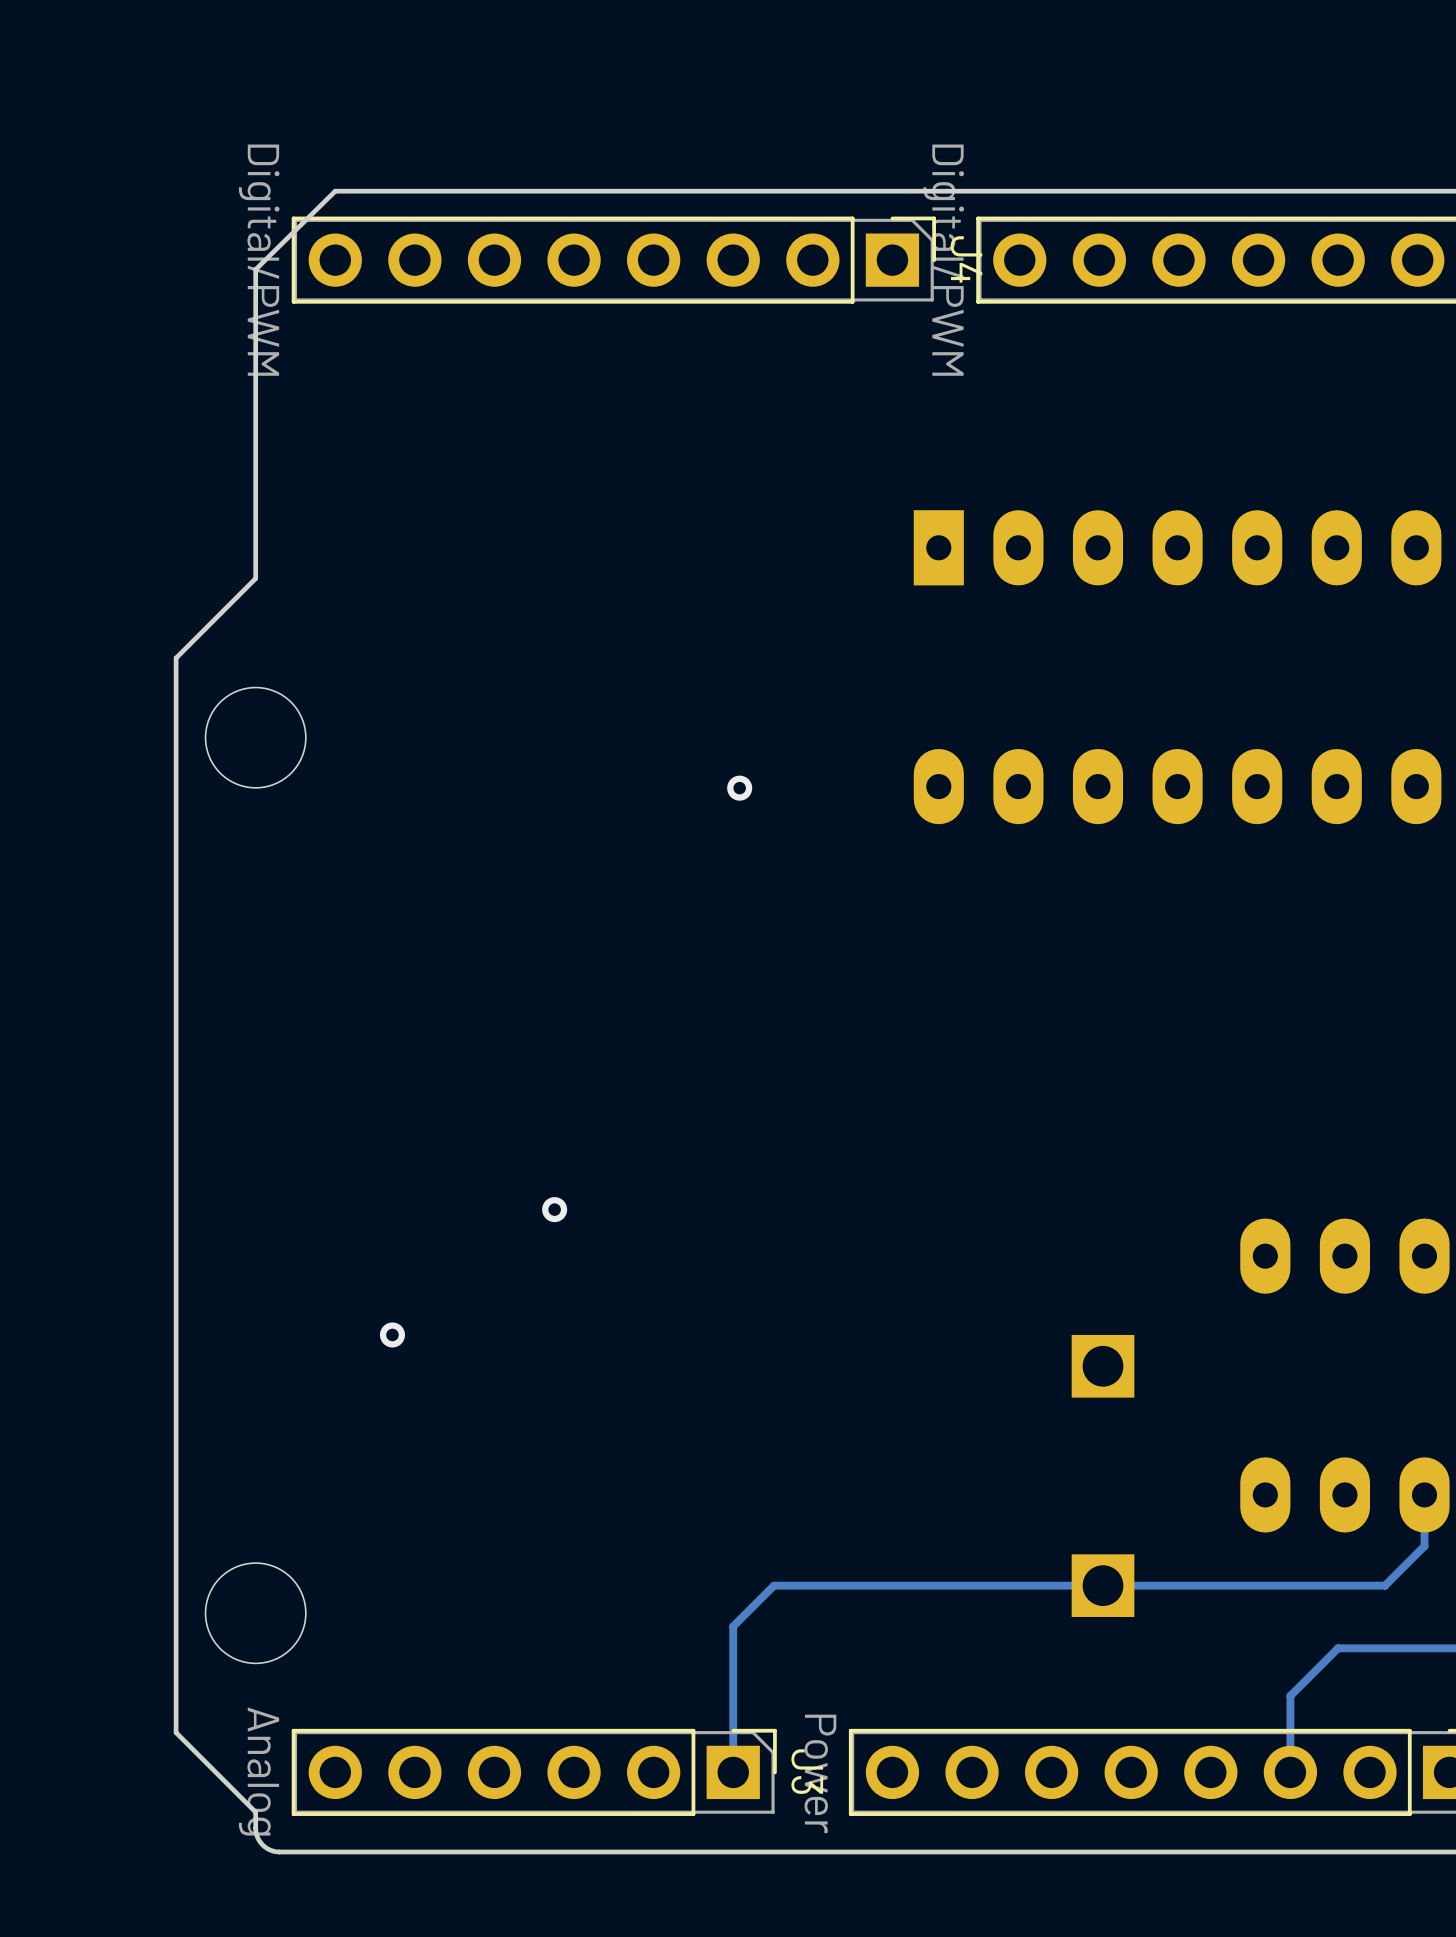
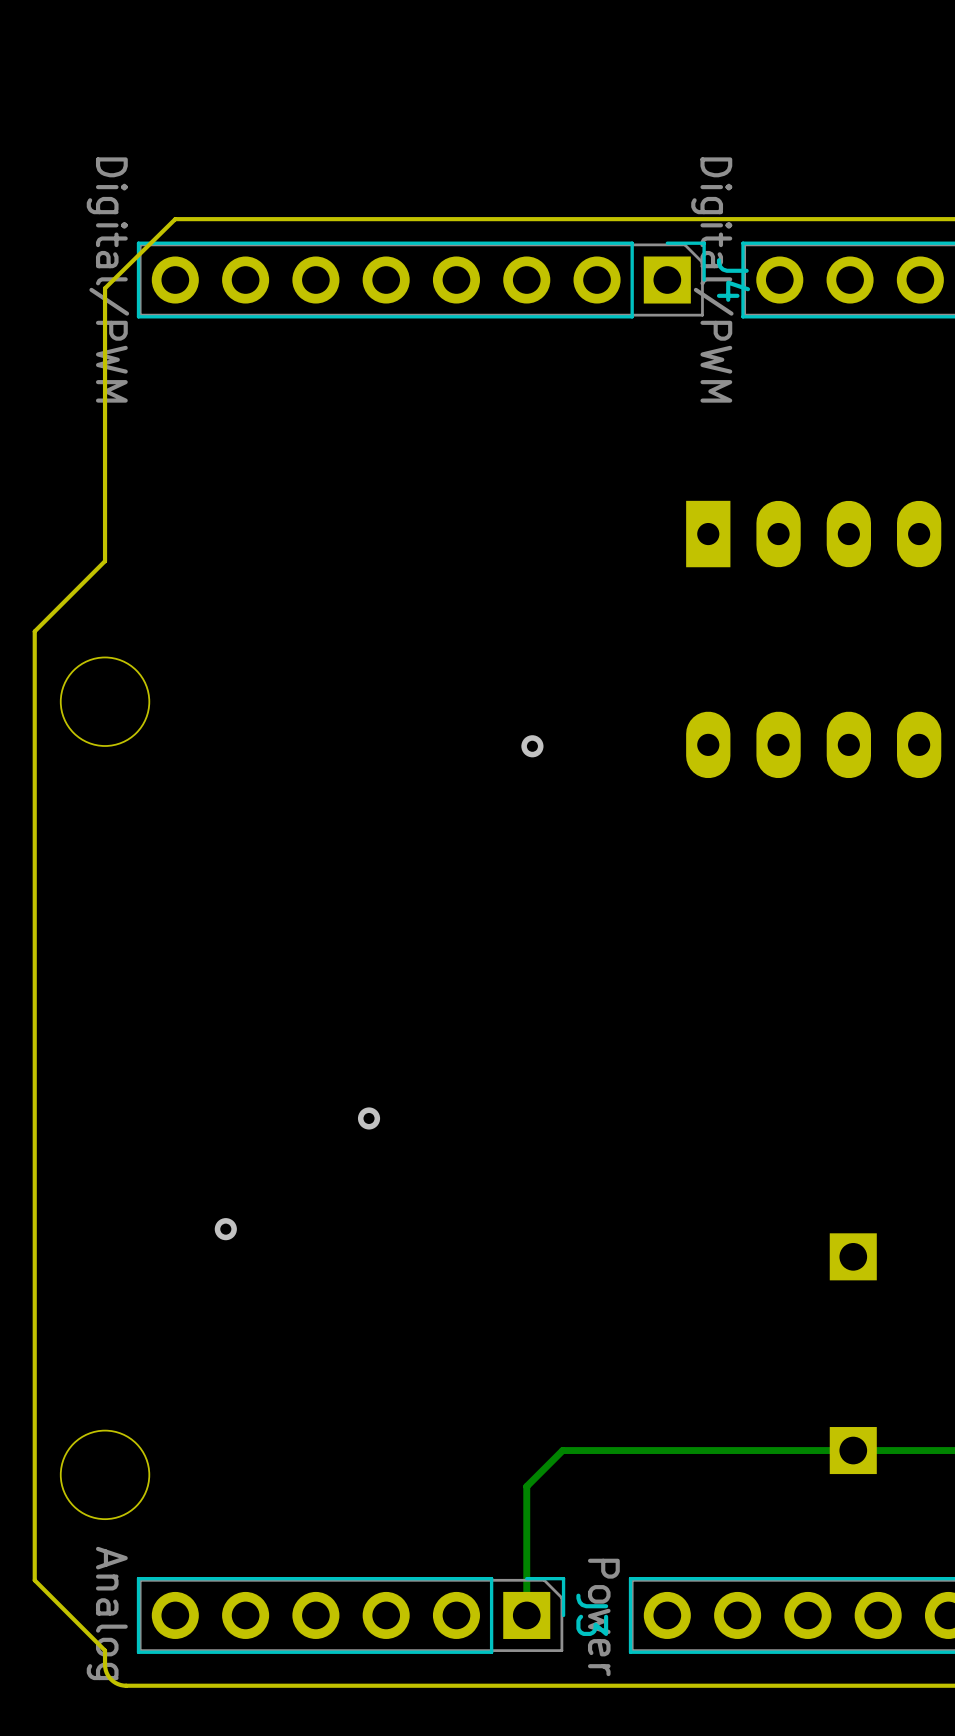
part footprint: [1071, 1334, 1135, 1398] -> [829, 1233, 877, 1281]
part footprint: [1071, 1554, 1135, 1617] -> [829, 1427, 877, 1475]

